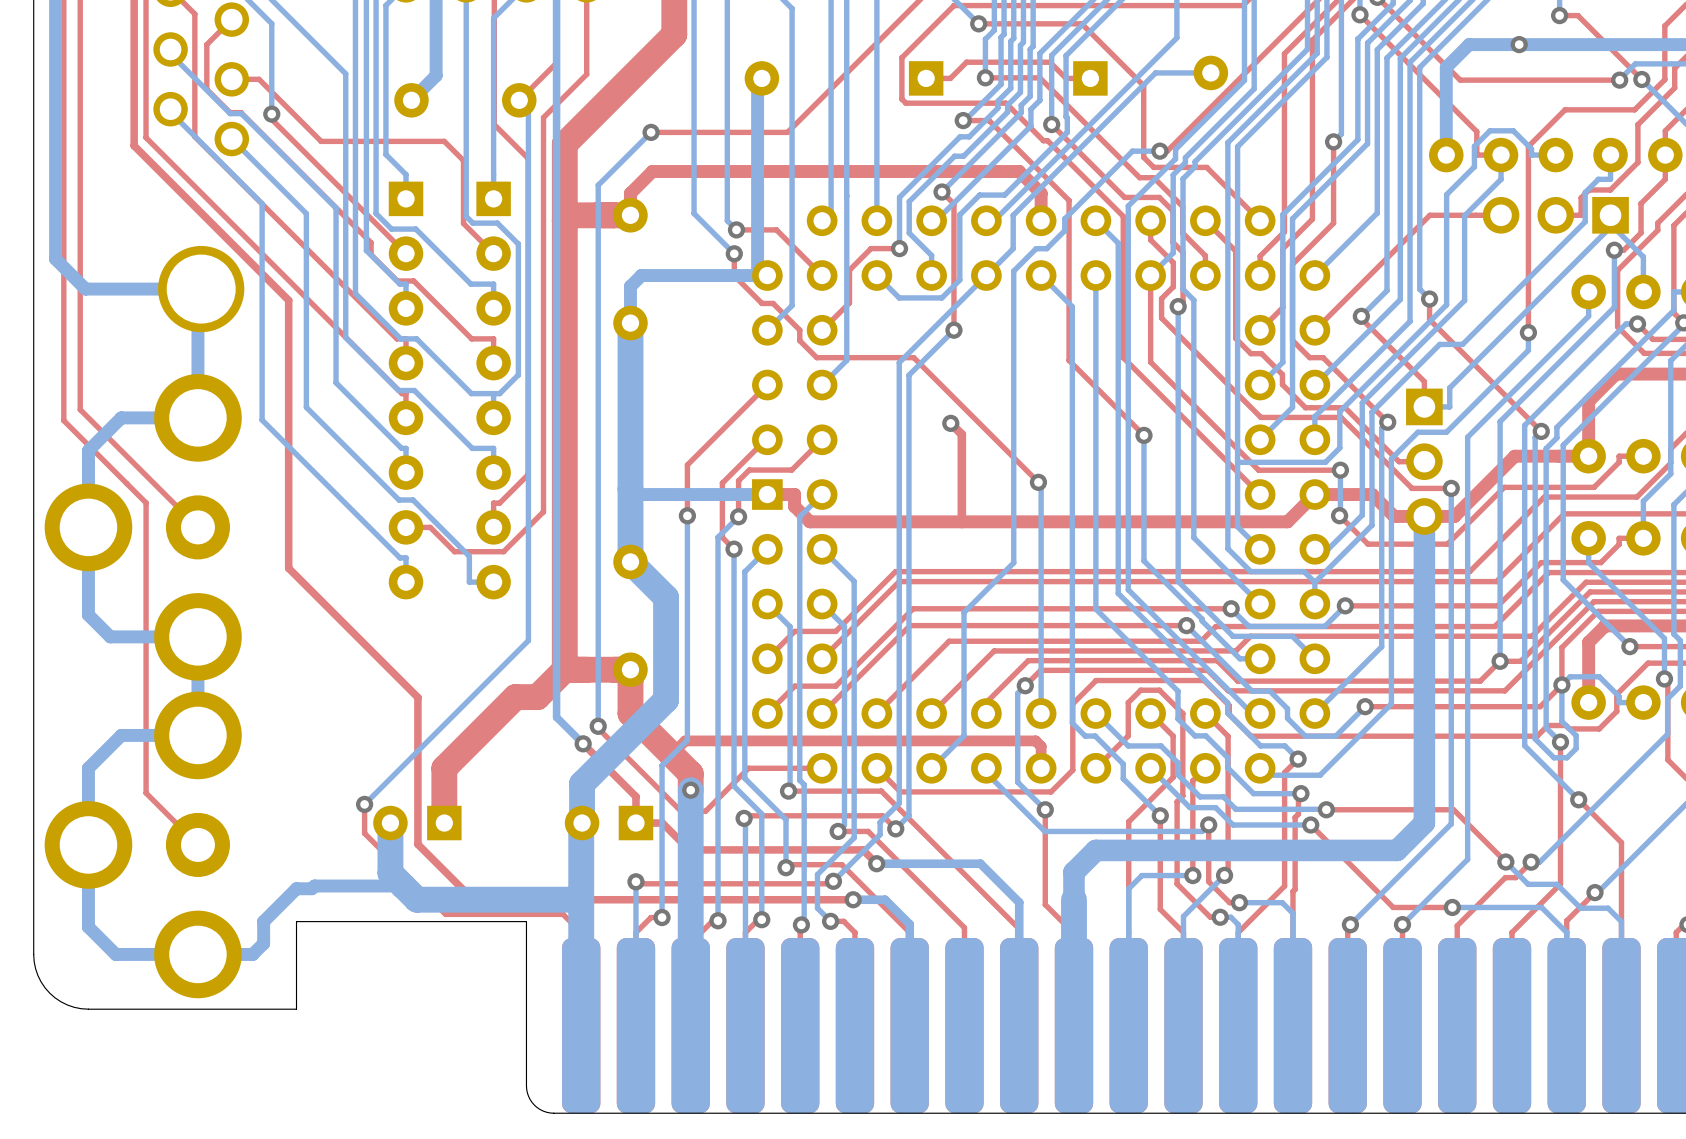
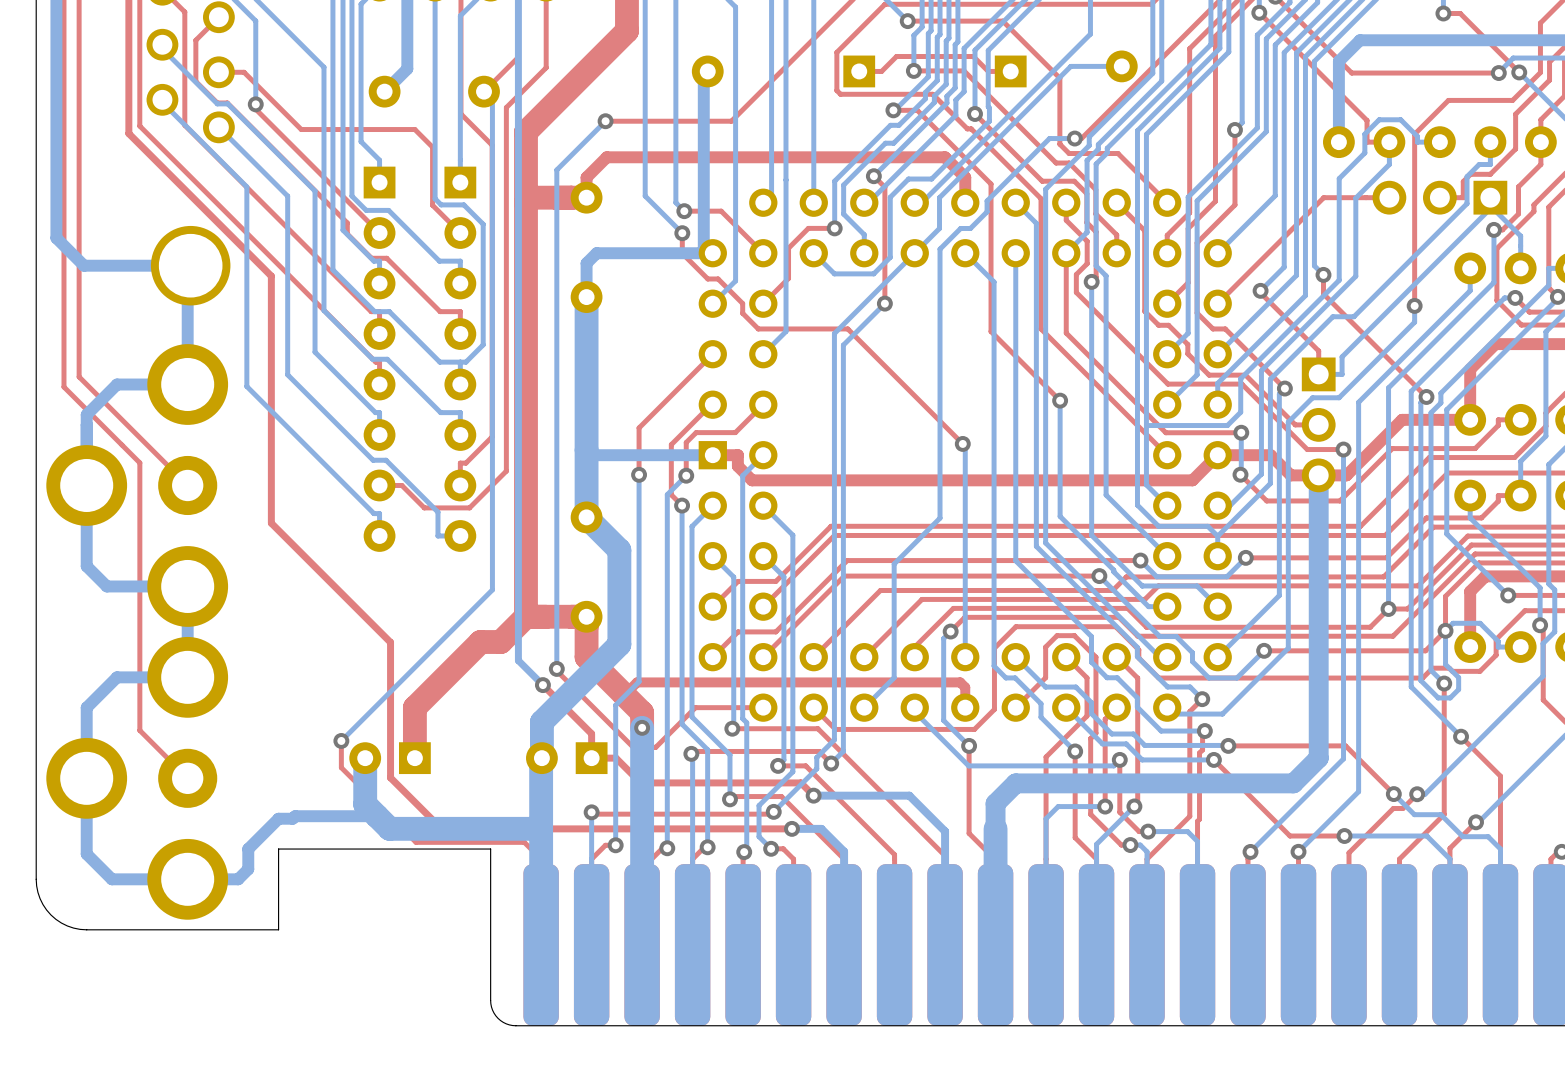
via: (1519, 44) -> none
top track: (950, 423) (961, 434) (961, 521) -> none
via: (950, 423) -> none

